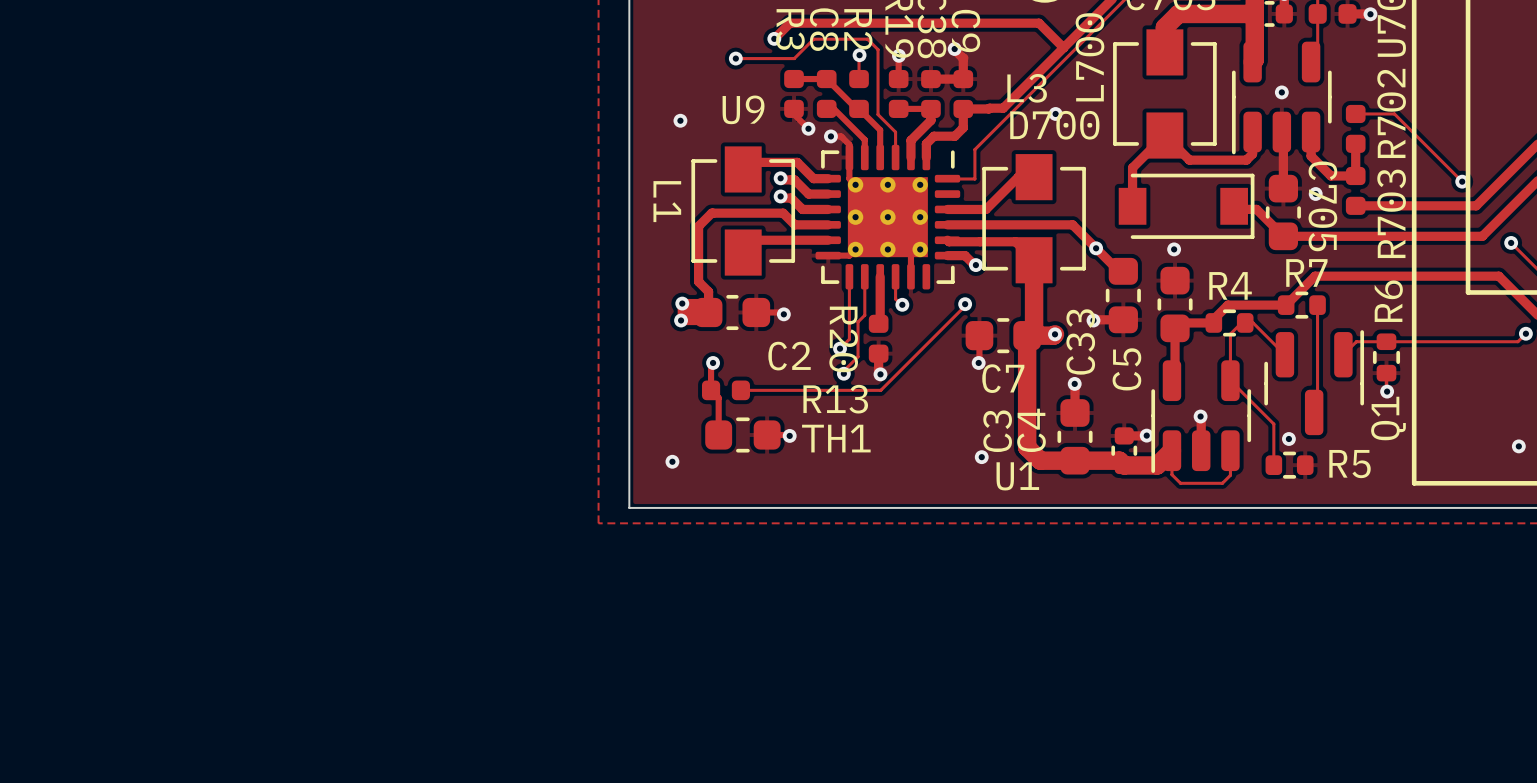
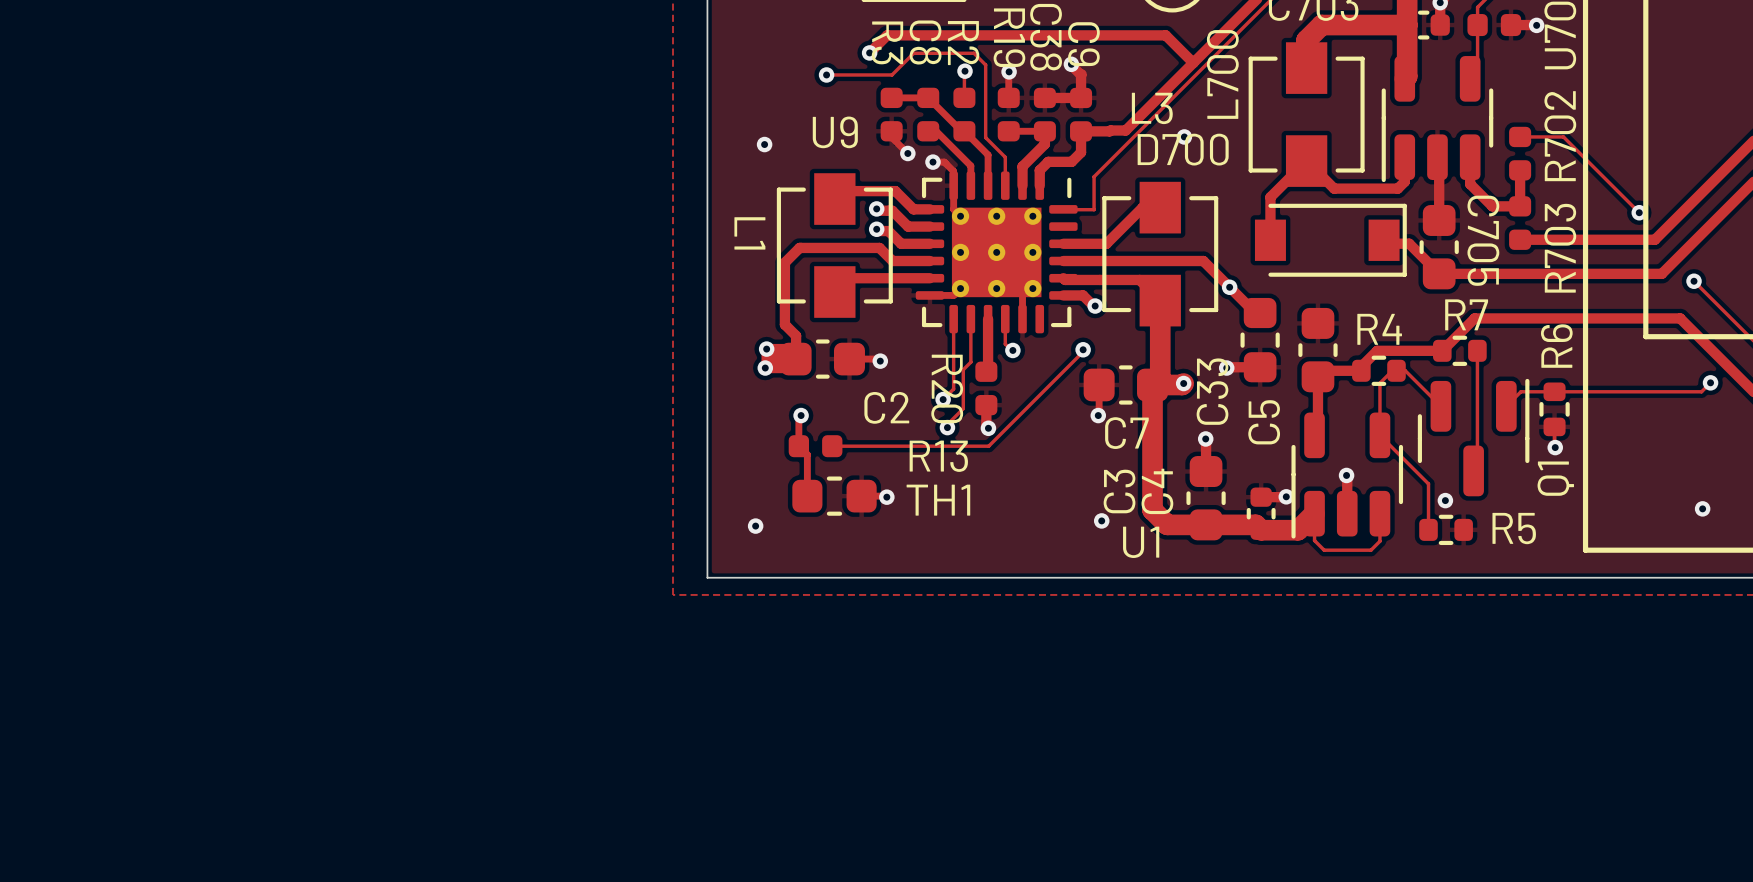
via: (1281, 92) -> none
via: (1315, 193) -> none
via: (1174, 249) -> none

